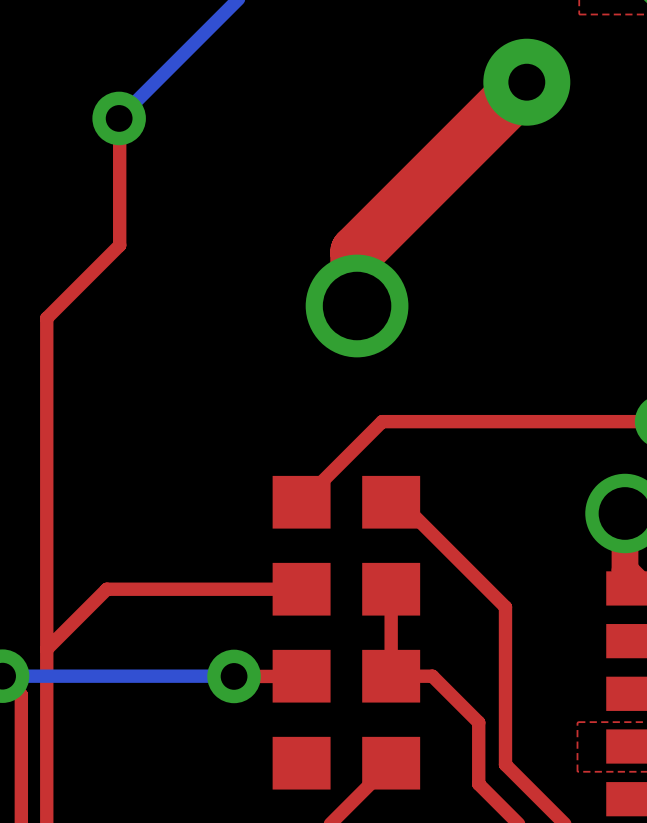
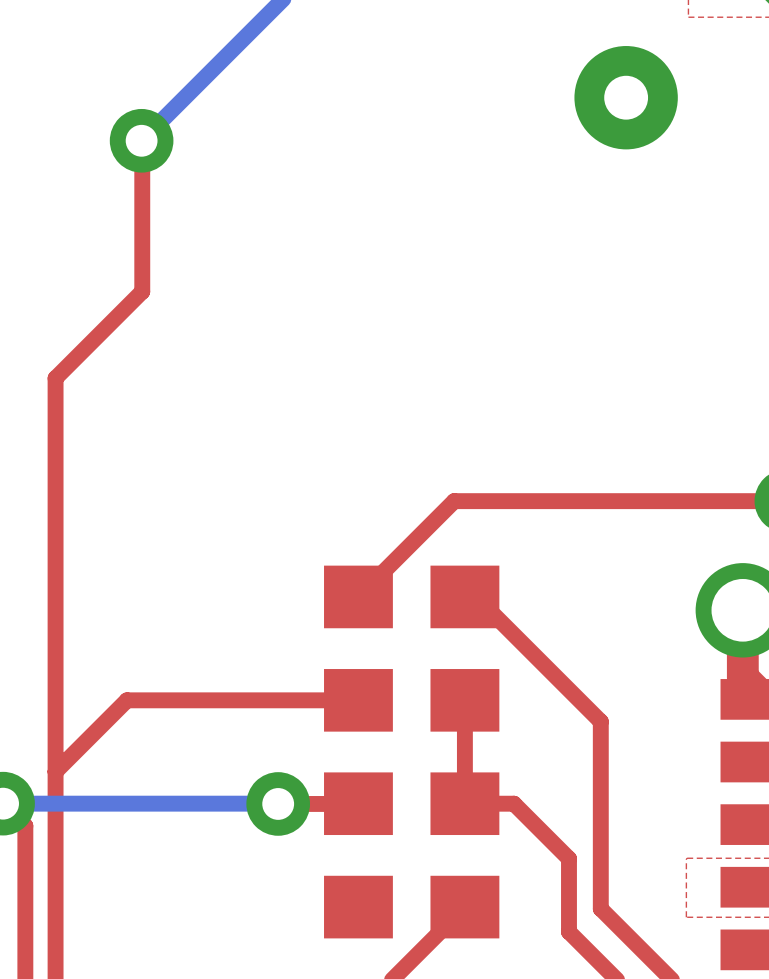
top track: (526, 82) (357, 251) (357, 306) -> none
part: (357, 306) -> none

